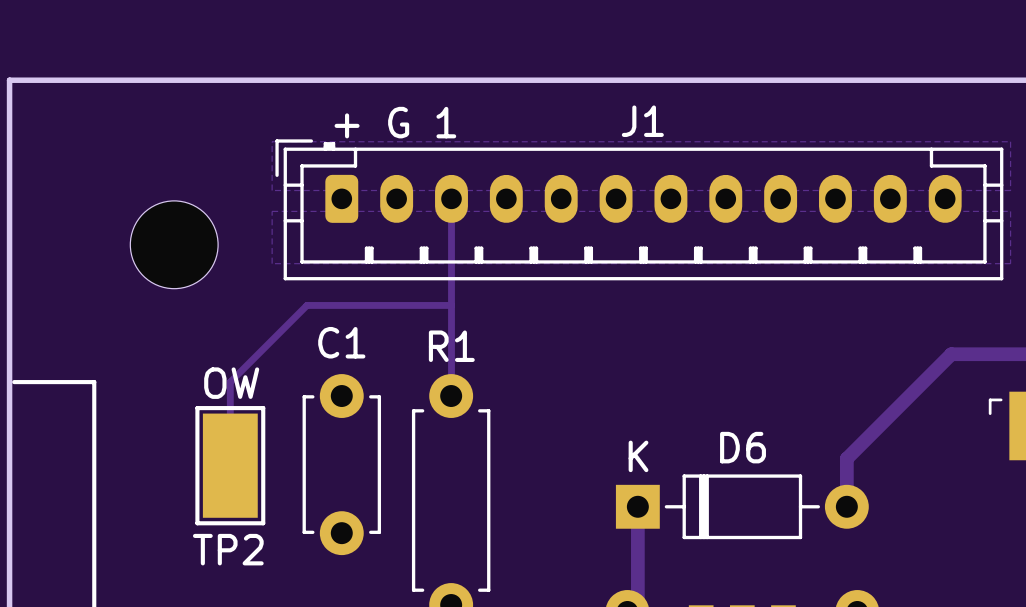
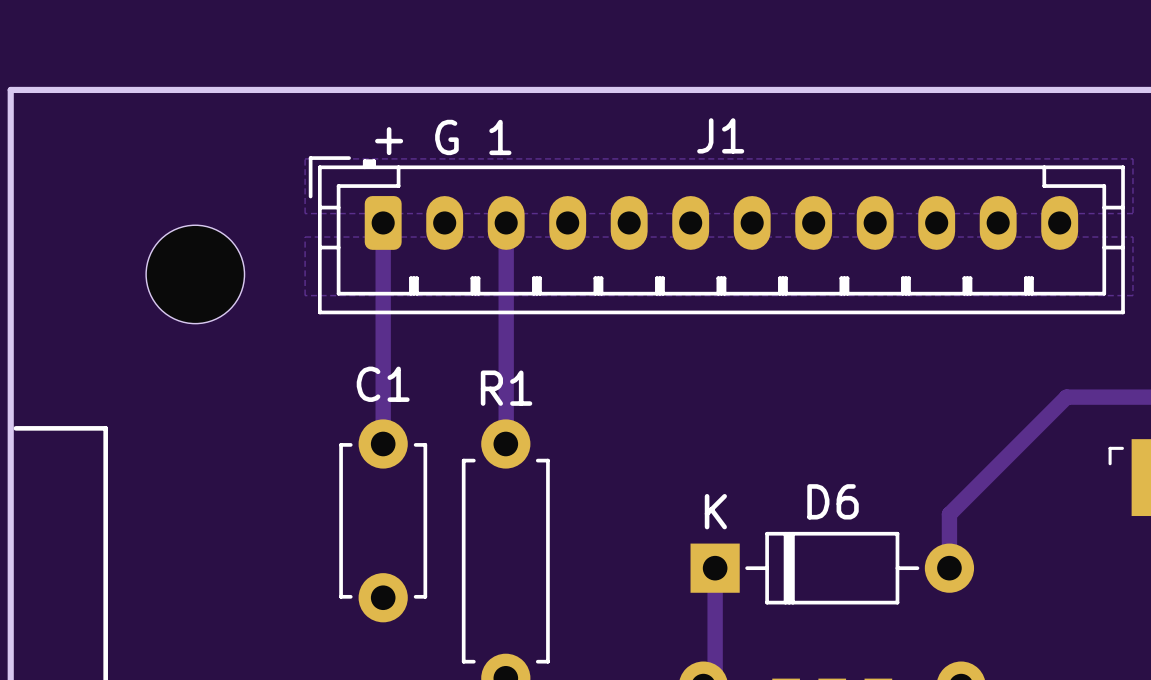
track: none -> (383, 225) (383, 443)
track width: thin (451, 200) (451, 394) -> thick (506, 225) (506, 442)
track: (451, 305) (306, 305) (230, 382) (230, 465) -> none
TP2: OW (230, 465) -> none

